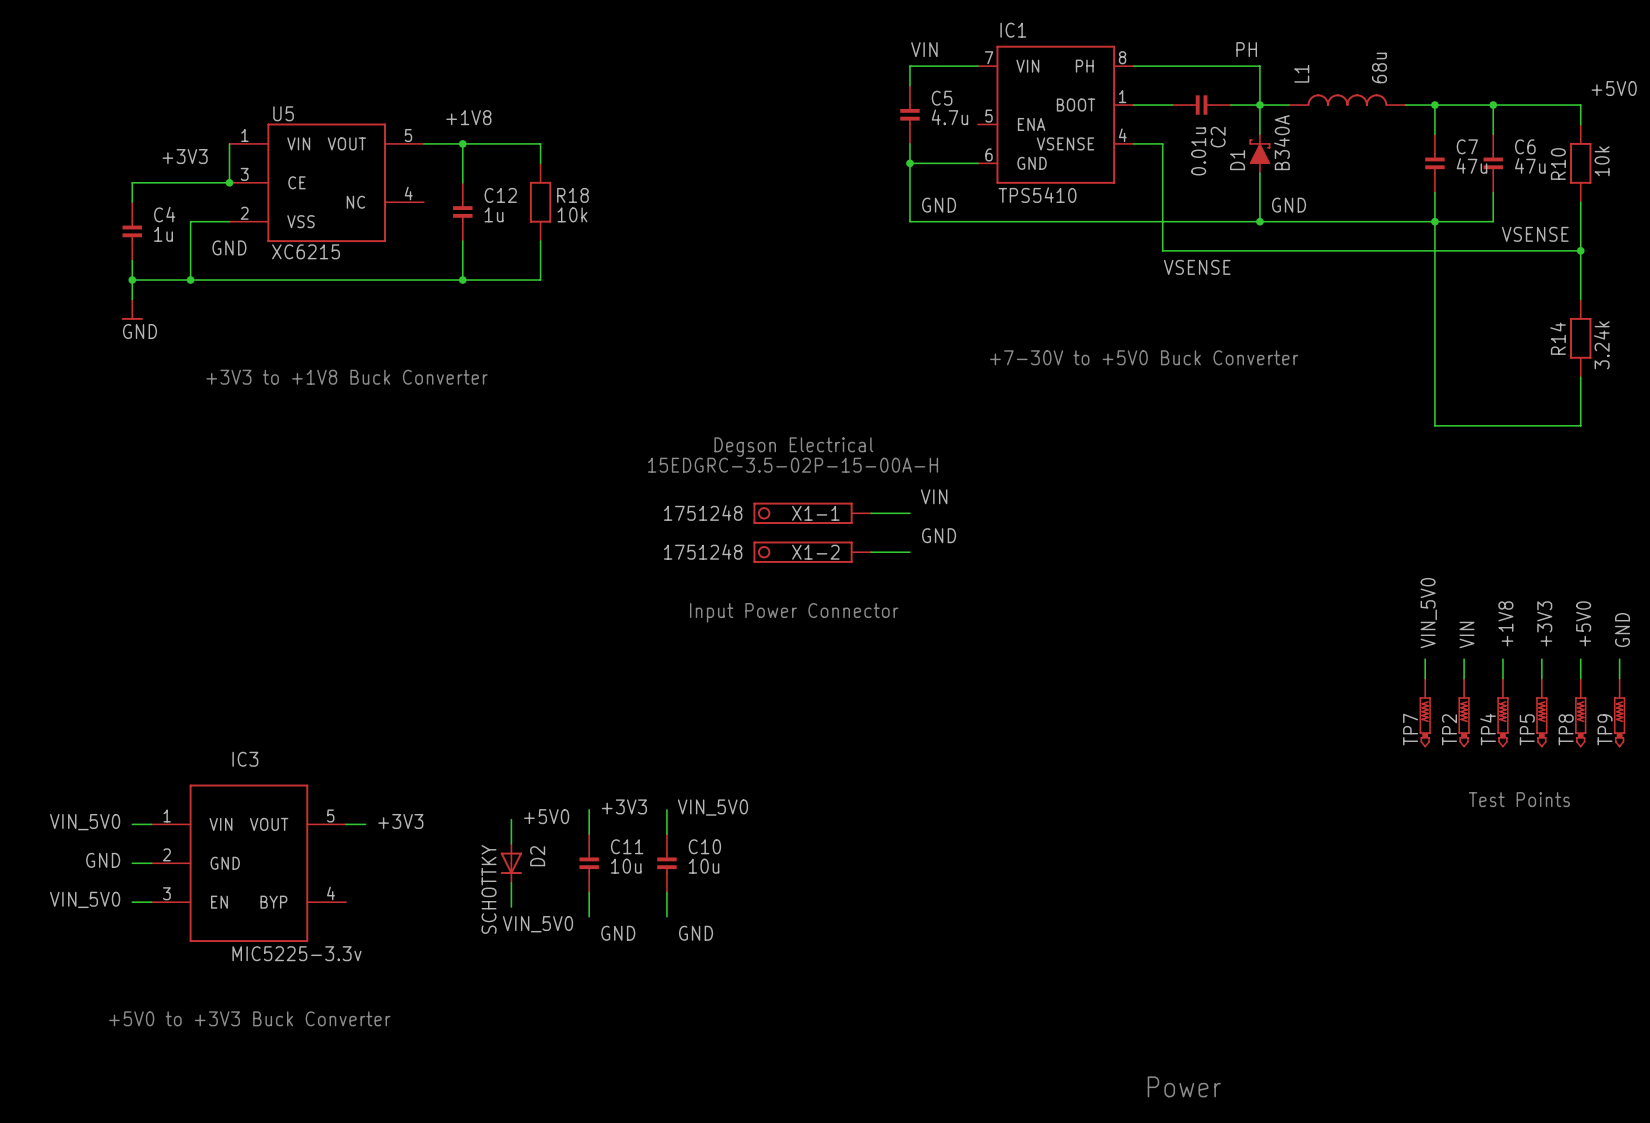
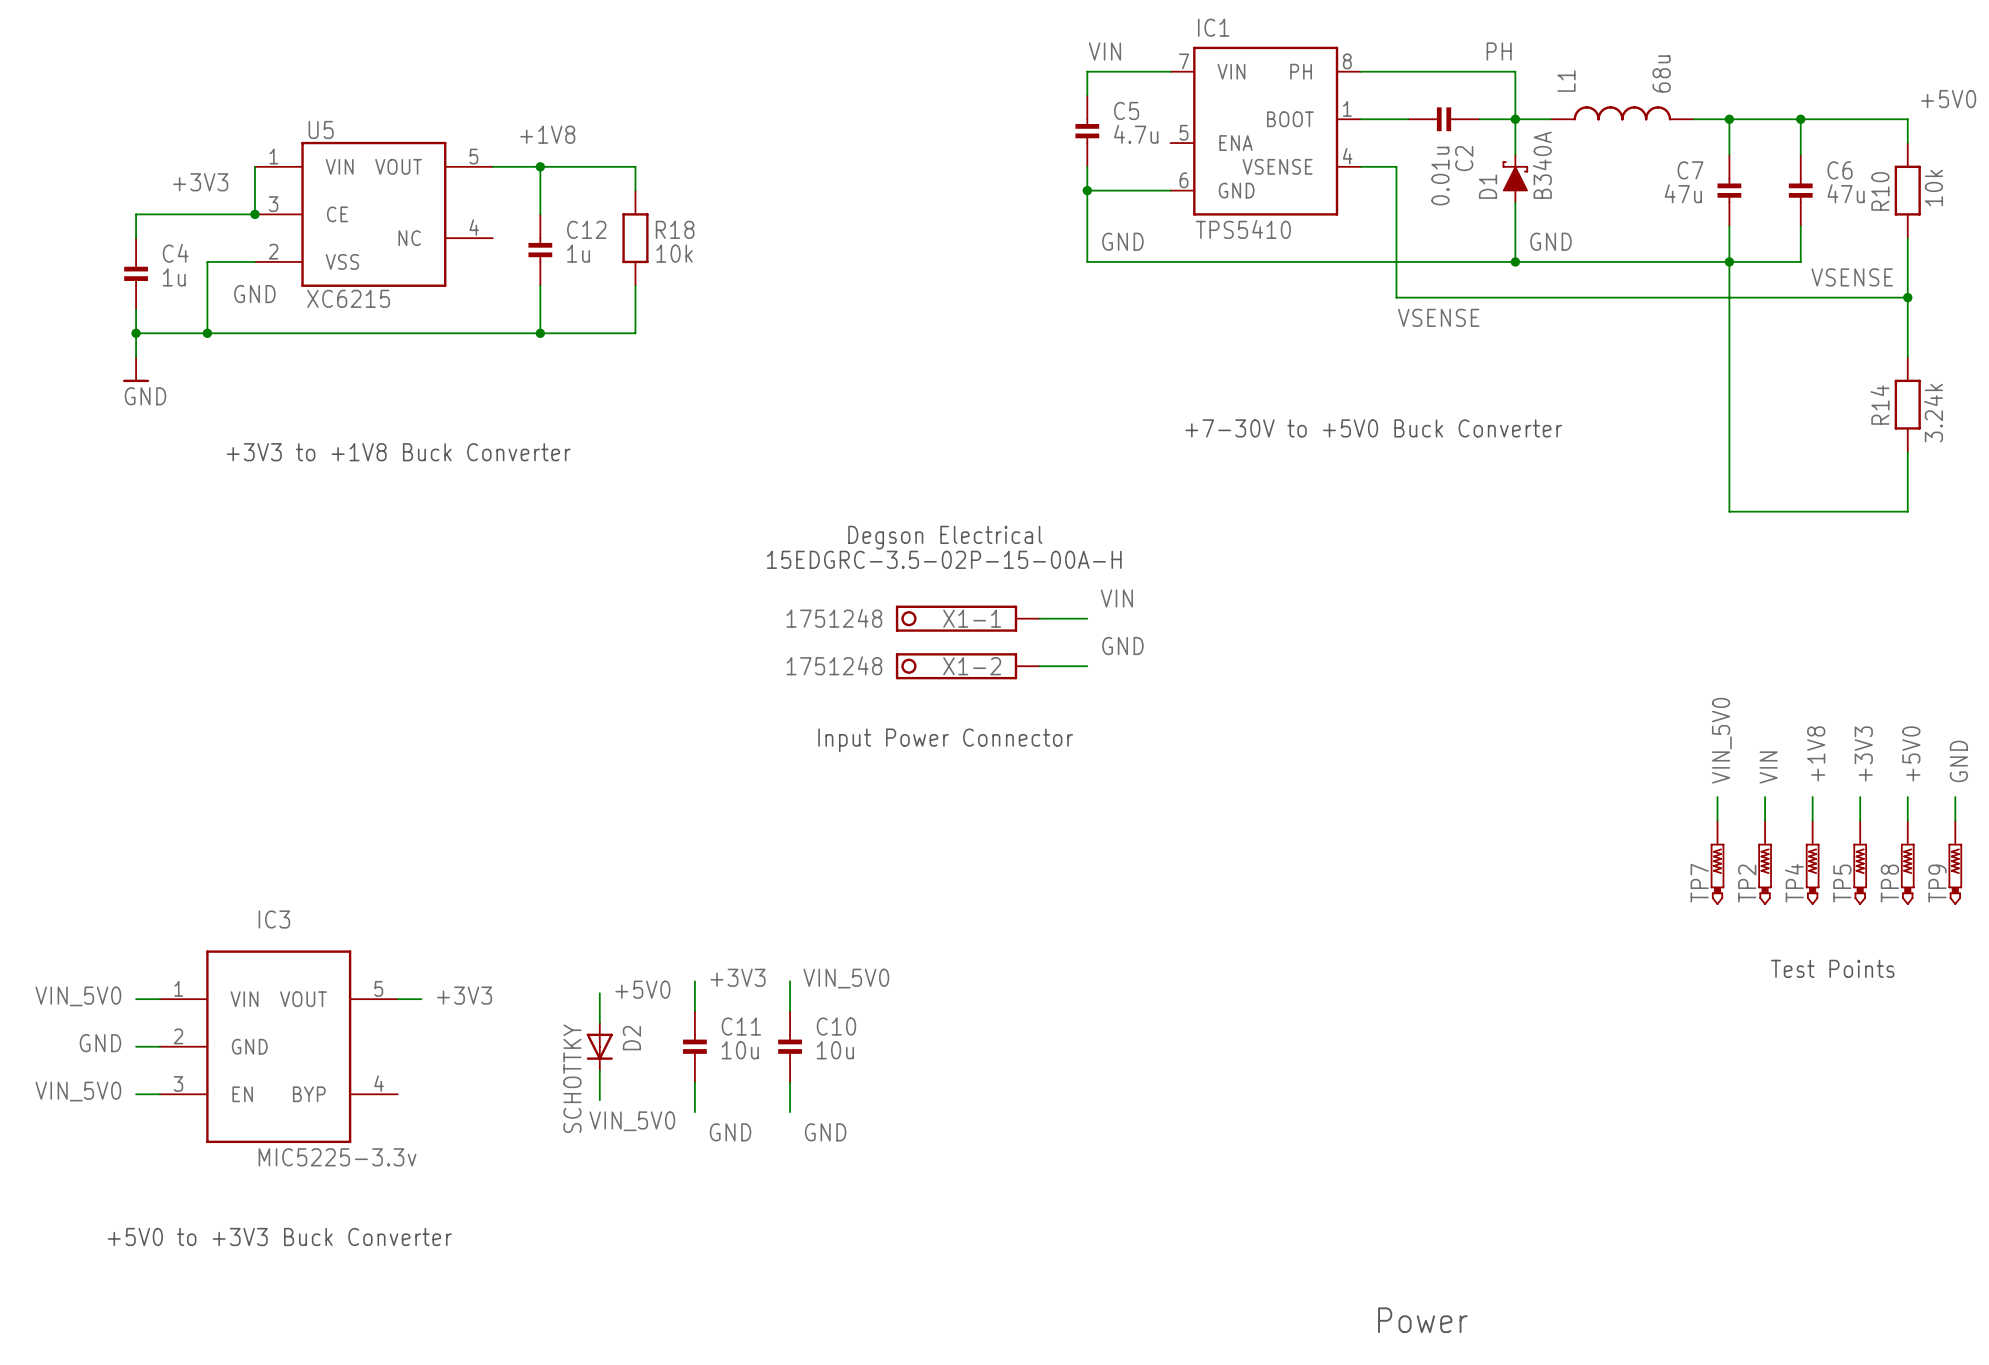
C7 name position: C7 (1467, 146) -> C7 (1690, 170)
C7 value position: 47u (1471, 165) -> 47u (1683, 193)

